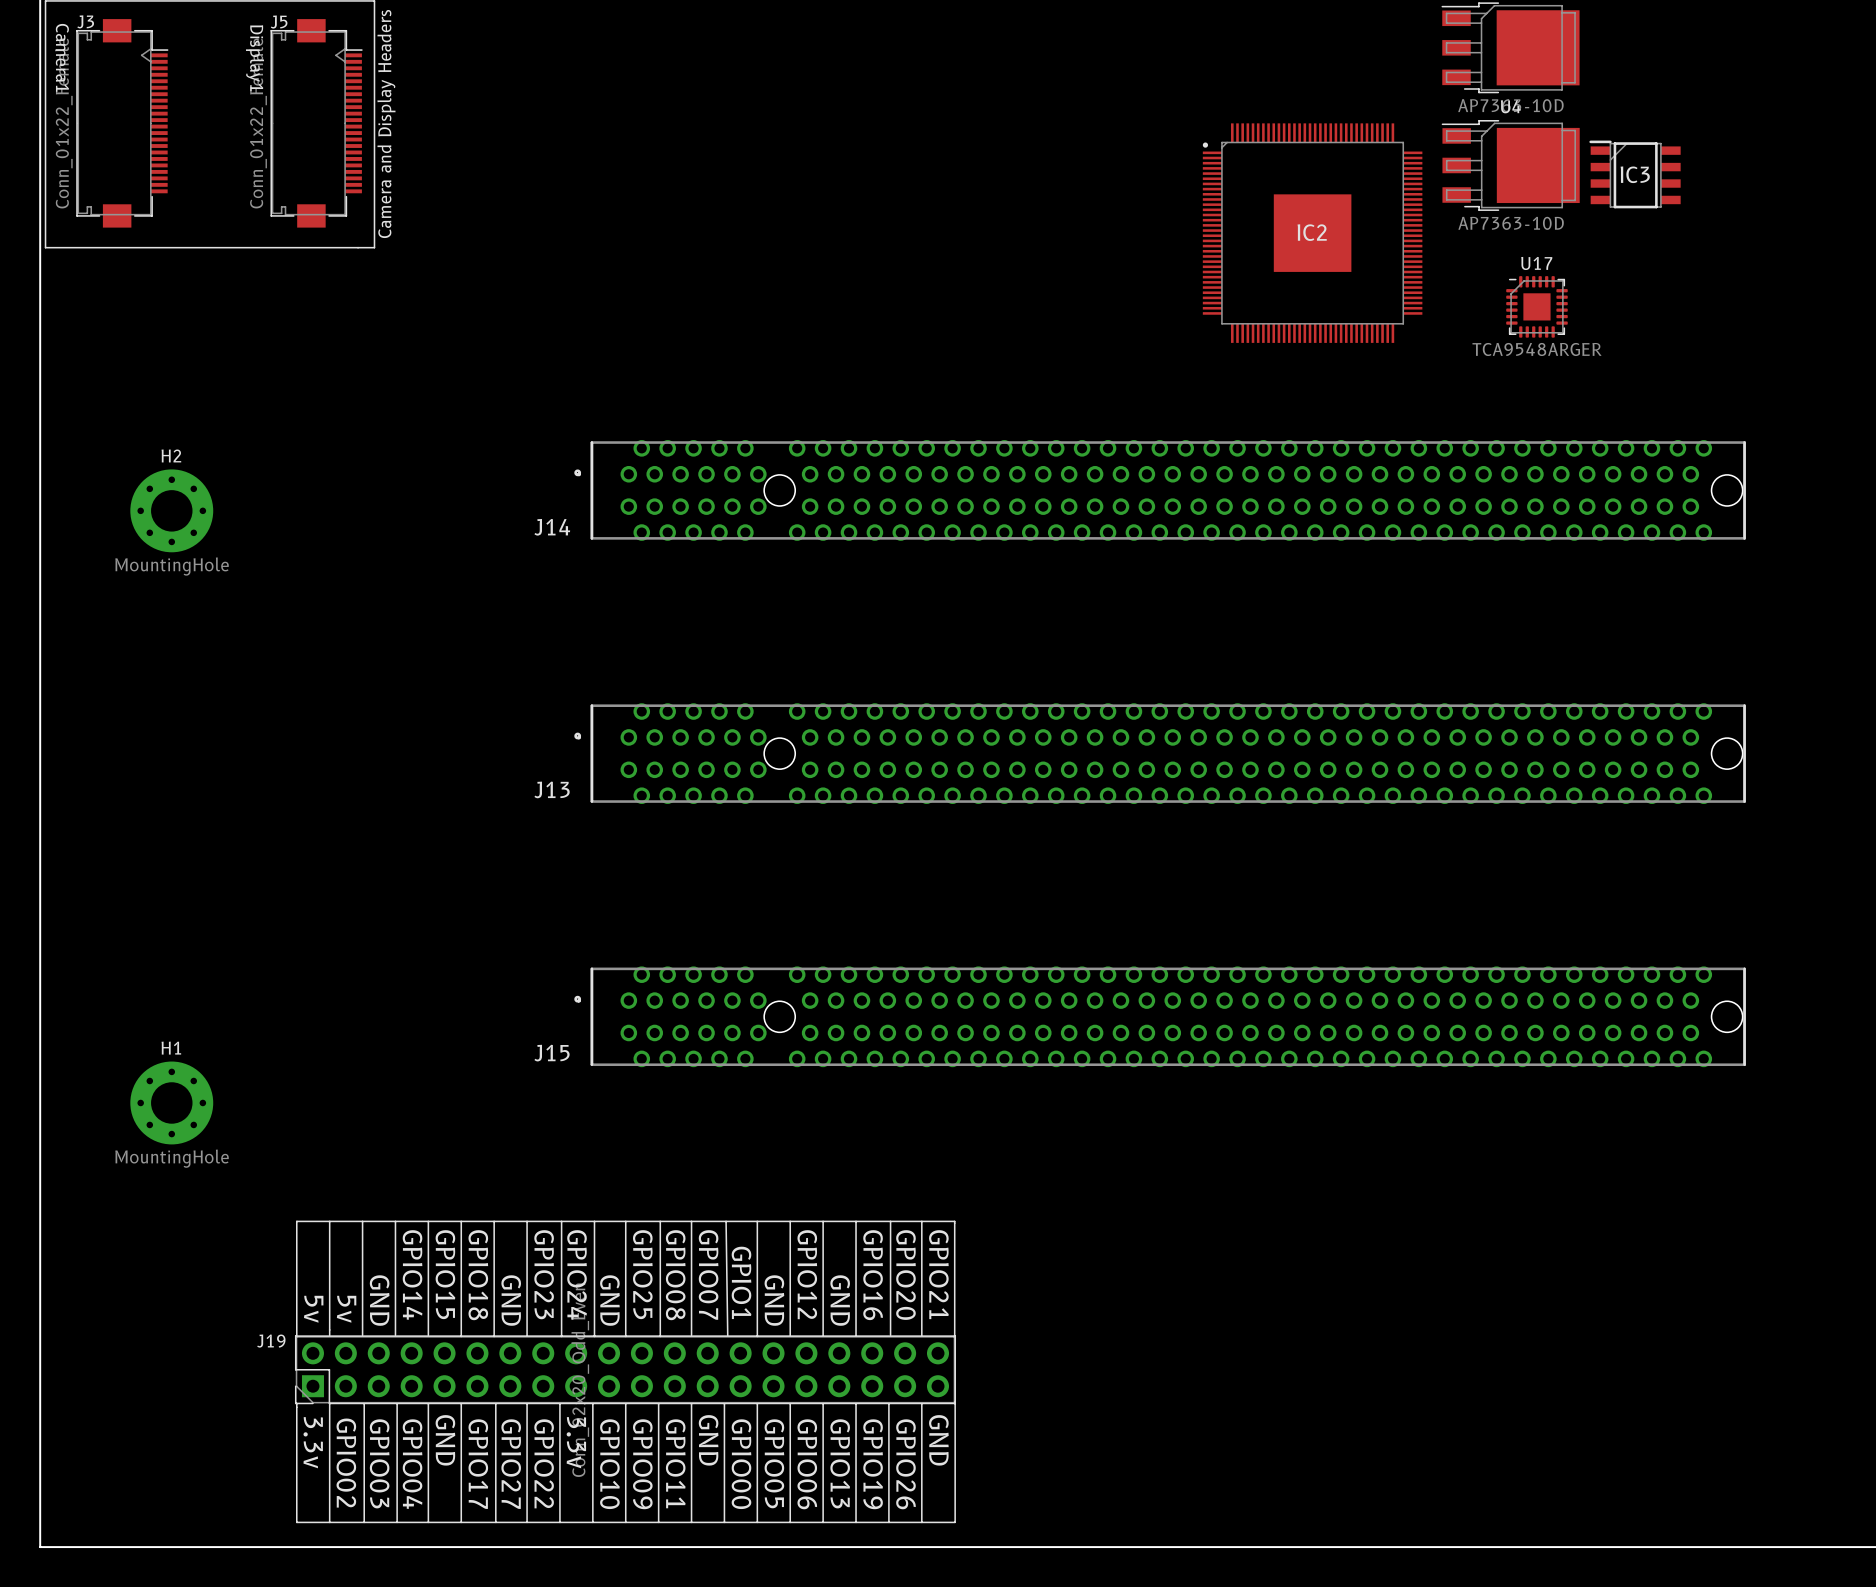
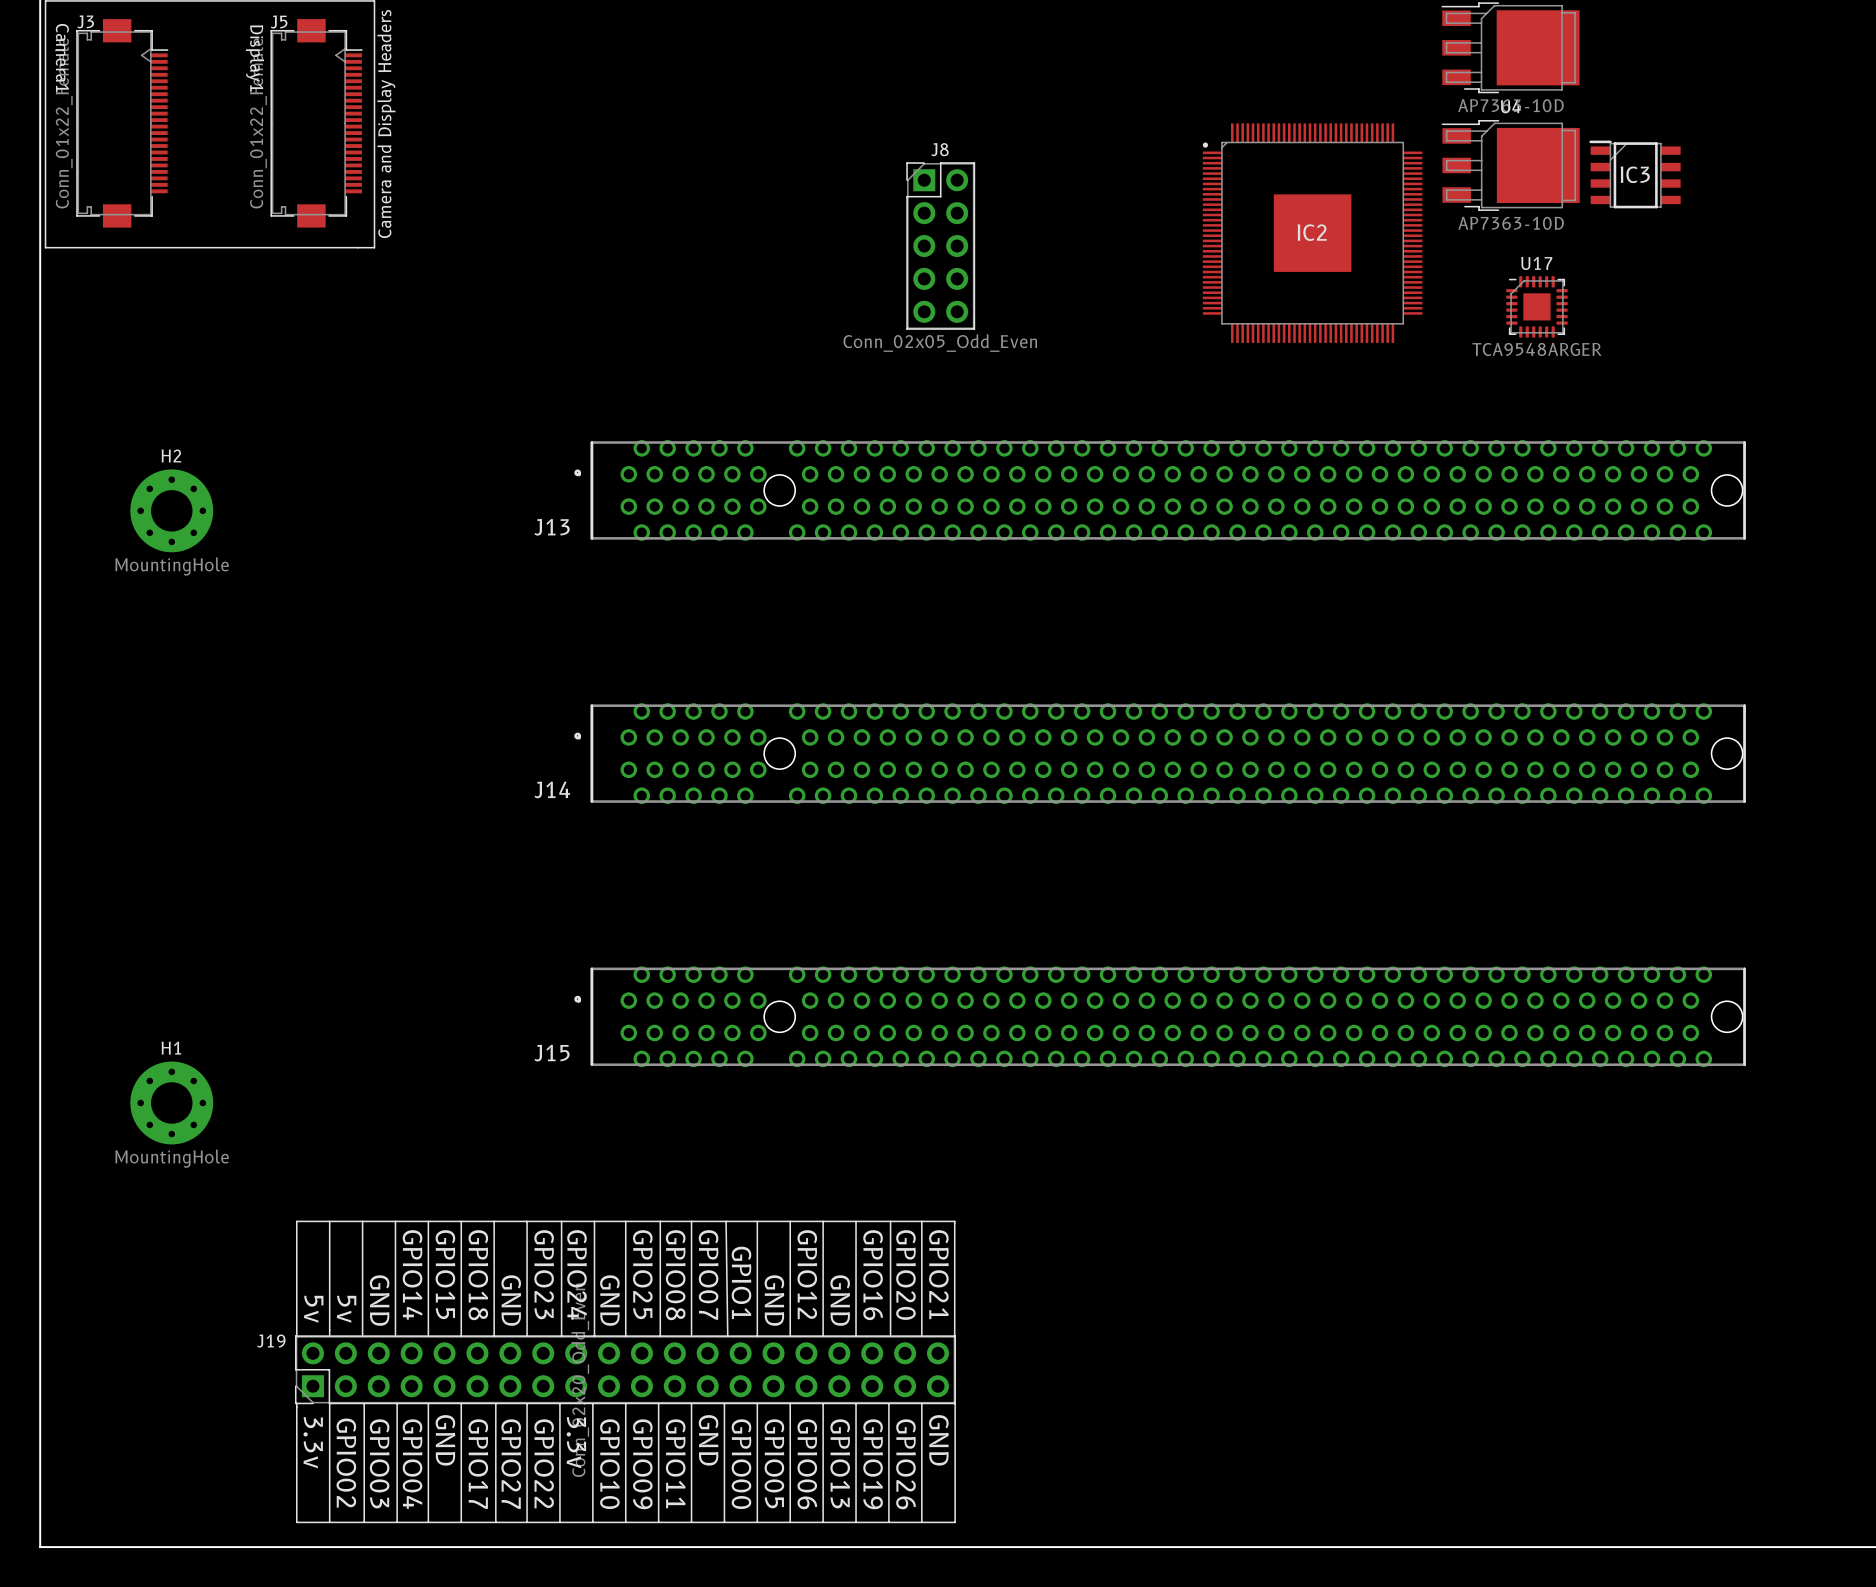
J8: none -> Conn_02x05_Odd_Even (940, 246)
J14 name: J14 (552, 527) -> J13 (552, 527)
J13 name: J13 (552, 789) -> J14 (552, 789)

